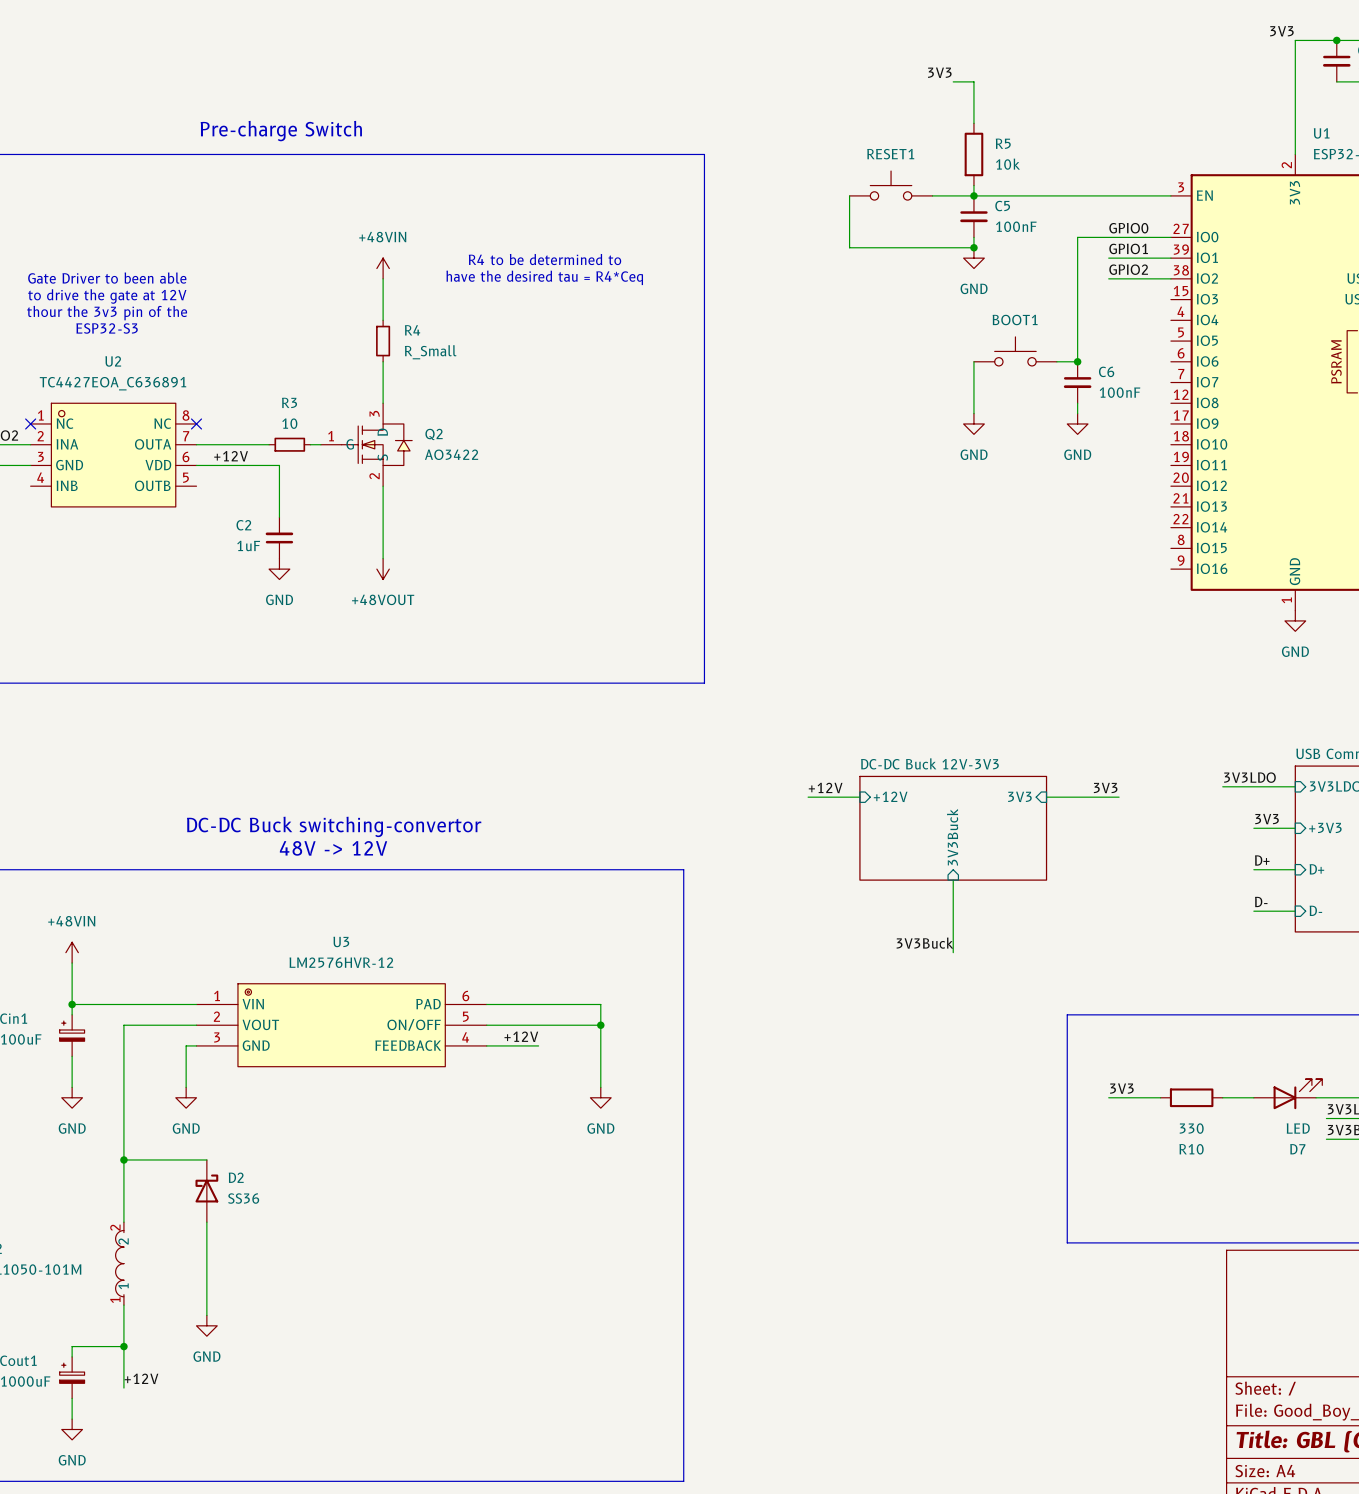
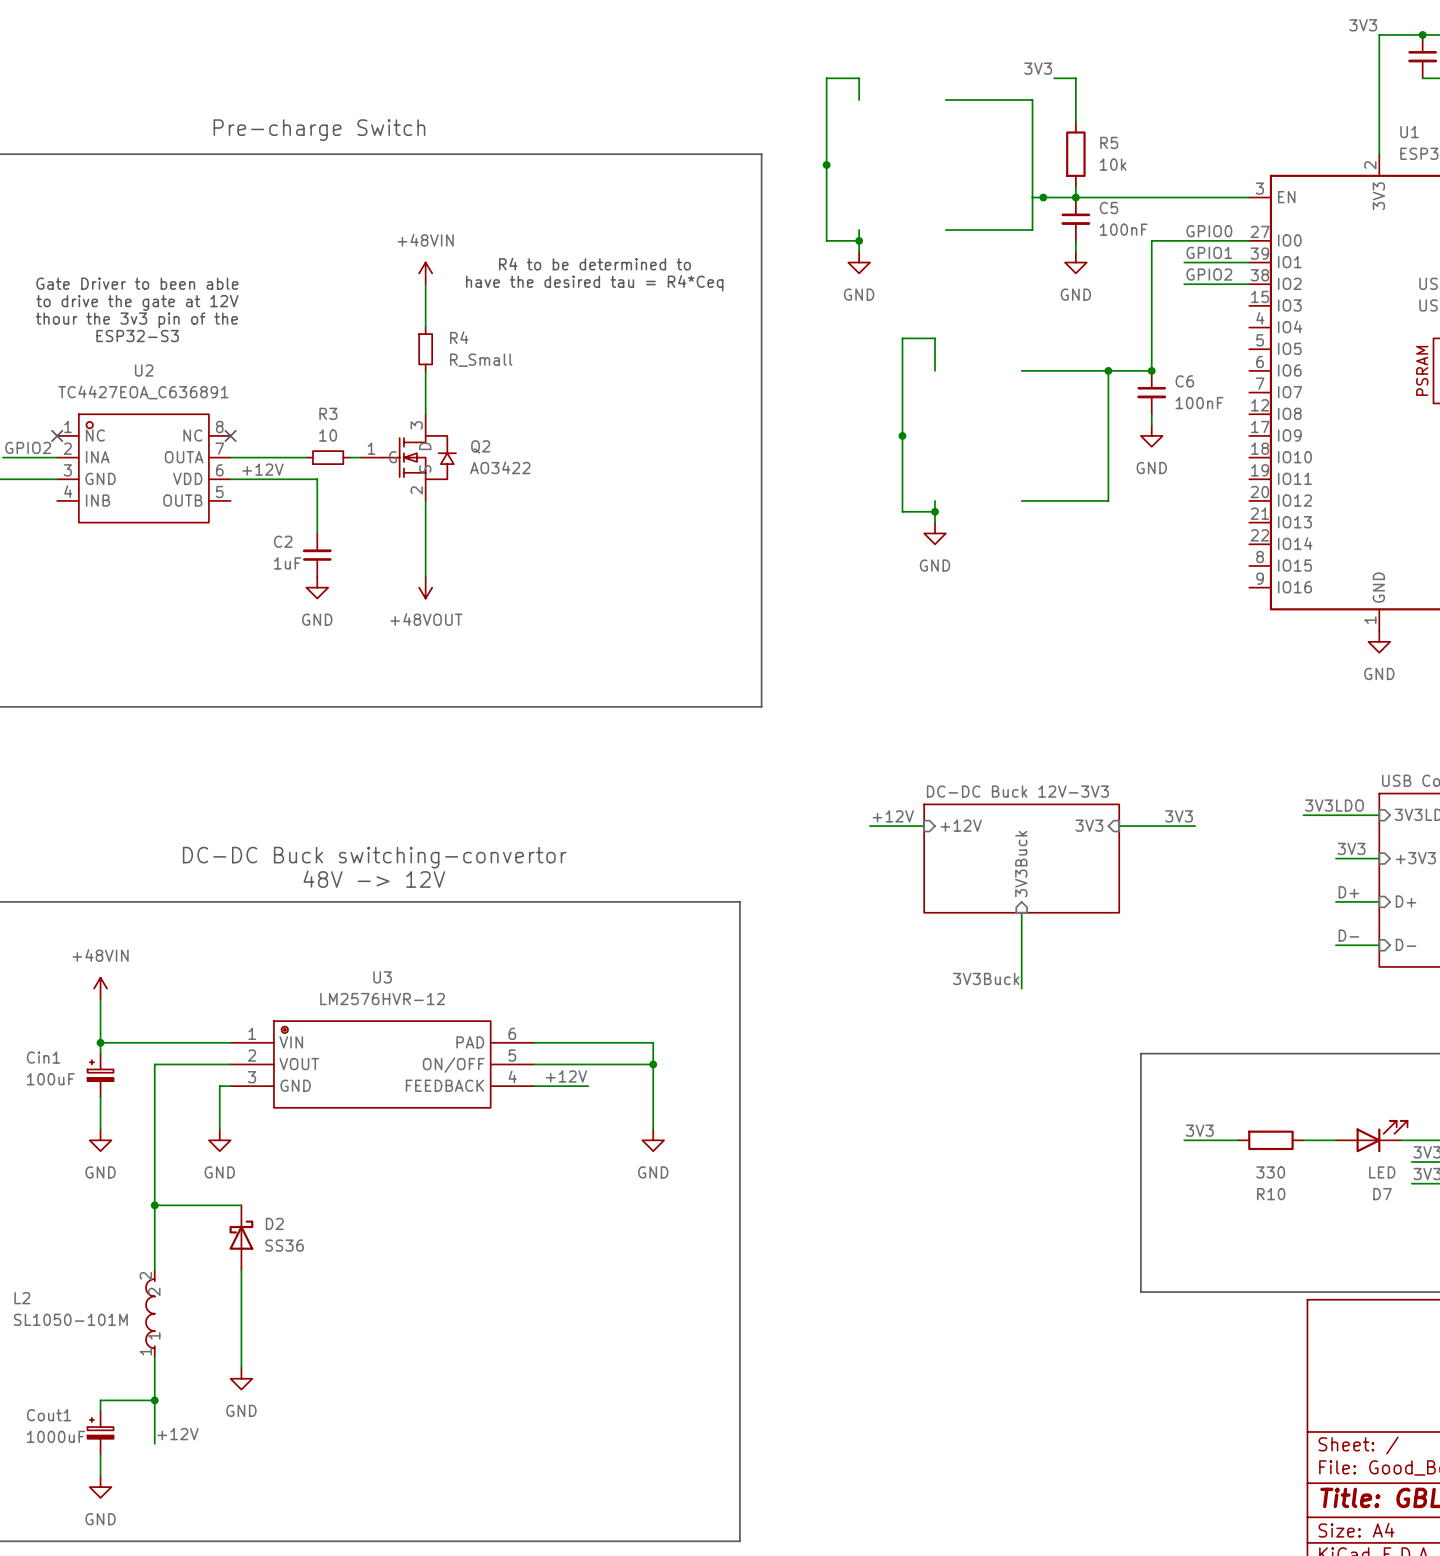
label position: 3V3 (939, 72) -> 3V3 (1038, 68)
wire: (953, 81) (973, 81) (973, 123) -> (1054, 78) (1075, 78) (1075, 121)
wire: none -> (859, 99) (859, 78) (826, 78) (826, 240) (859, 240)
wire: none -> (945, 99) (1032, 99) (1032, 230) (945, 230)
R5 position: (973, 154) -> (1075, 154)
junction: none -> (826, 165)
part: RESET1 (891, 185) -> none
wire: (973, 185) (973, 195) -> (1075, 186) (1075, 197)
wire: (849, 195) (849, 247) (973, 247) (973, 237) -> none
wire: (932, 195) (963, 195) -> none
junction: none -> (1075, 197)
C5 position: (973, 216) -> (1075, 219)
wire: none -> (859, 230) (859, 251)
junction: none -> (859, 240)
wire: none -> (1075, 240) (1075, 251)
junction: (973, 247) -> none
power symbol: none -> GND (859, 262)
power symbol position: GND (973, 258) -> GND (1075, 262)
part: BOOT1 (1015, 351) -> none
wire: none -> (934, 370) (934, 338) (902, 338) (902, 511) (934, 511)
wire: none -> (1021, 370) (1130, 370)
wire: (973, 361) (973, 413) -> none
wire: none -> (1108, 370) (1108, 500) (1021, 500)
junction: none -> (1108, 370)
junction: none -> (902, 435)
power symbol: GND (973, 423) -> none
wire: none -> (934, 500) (934, 522)
junction: none -> (934, 511)
power symbol: none -> GND (934, 533)

